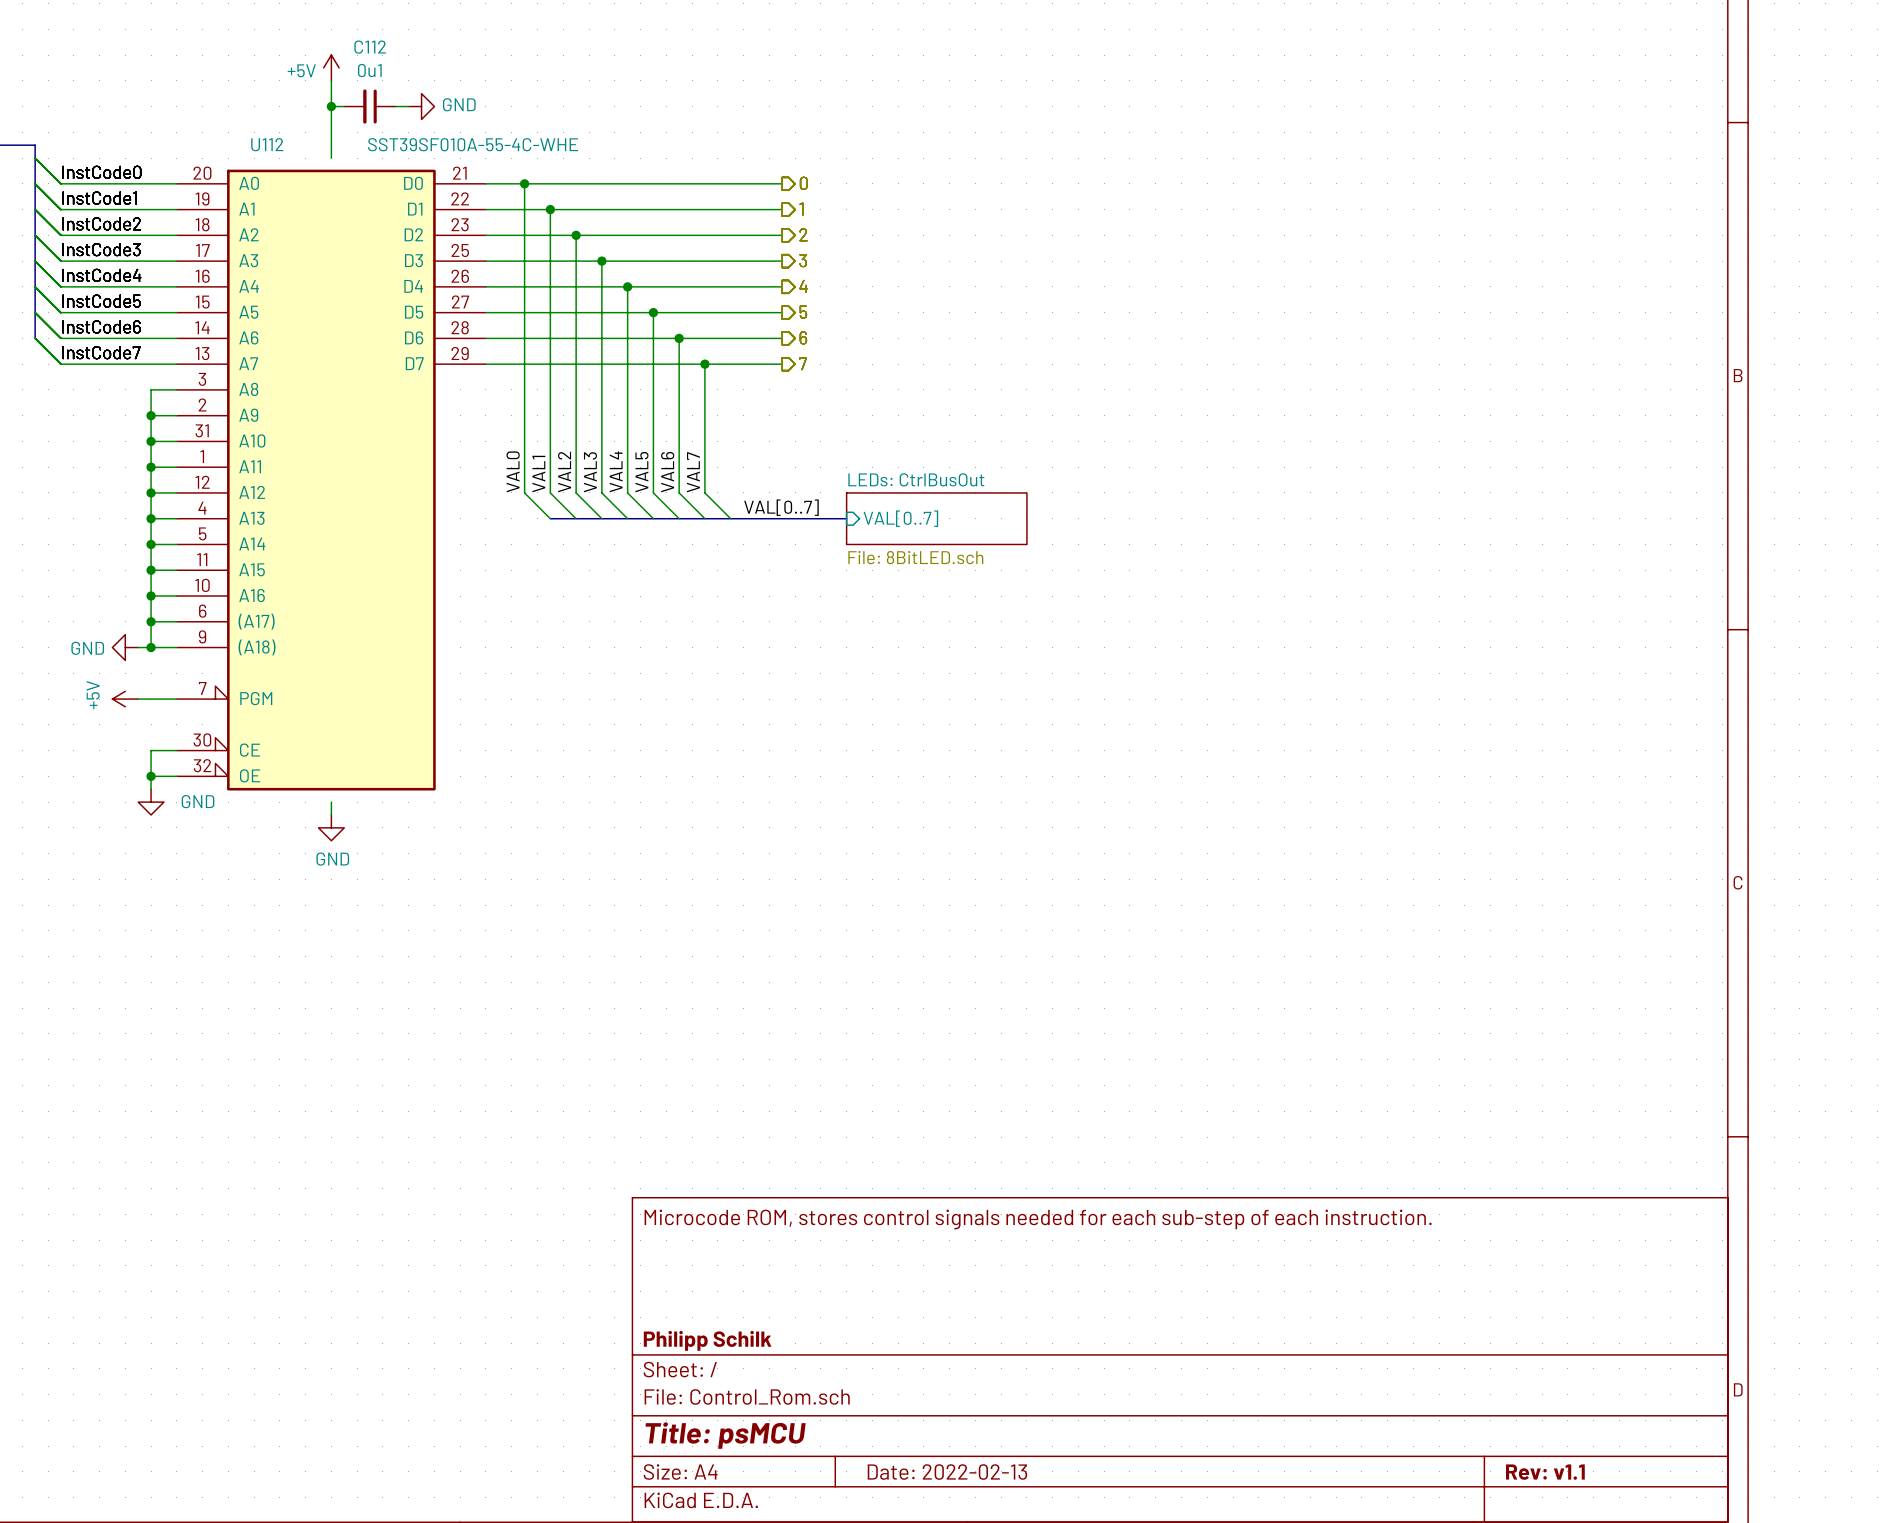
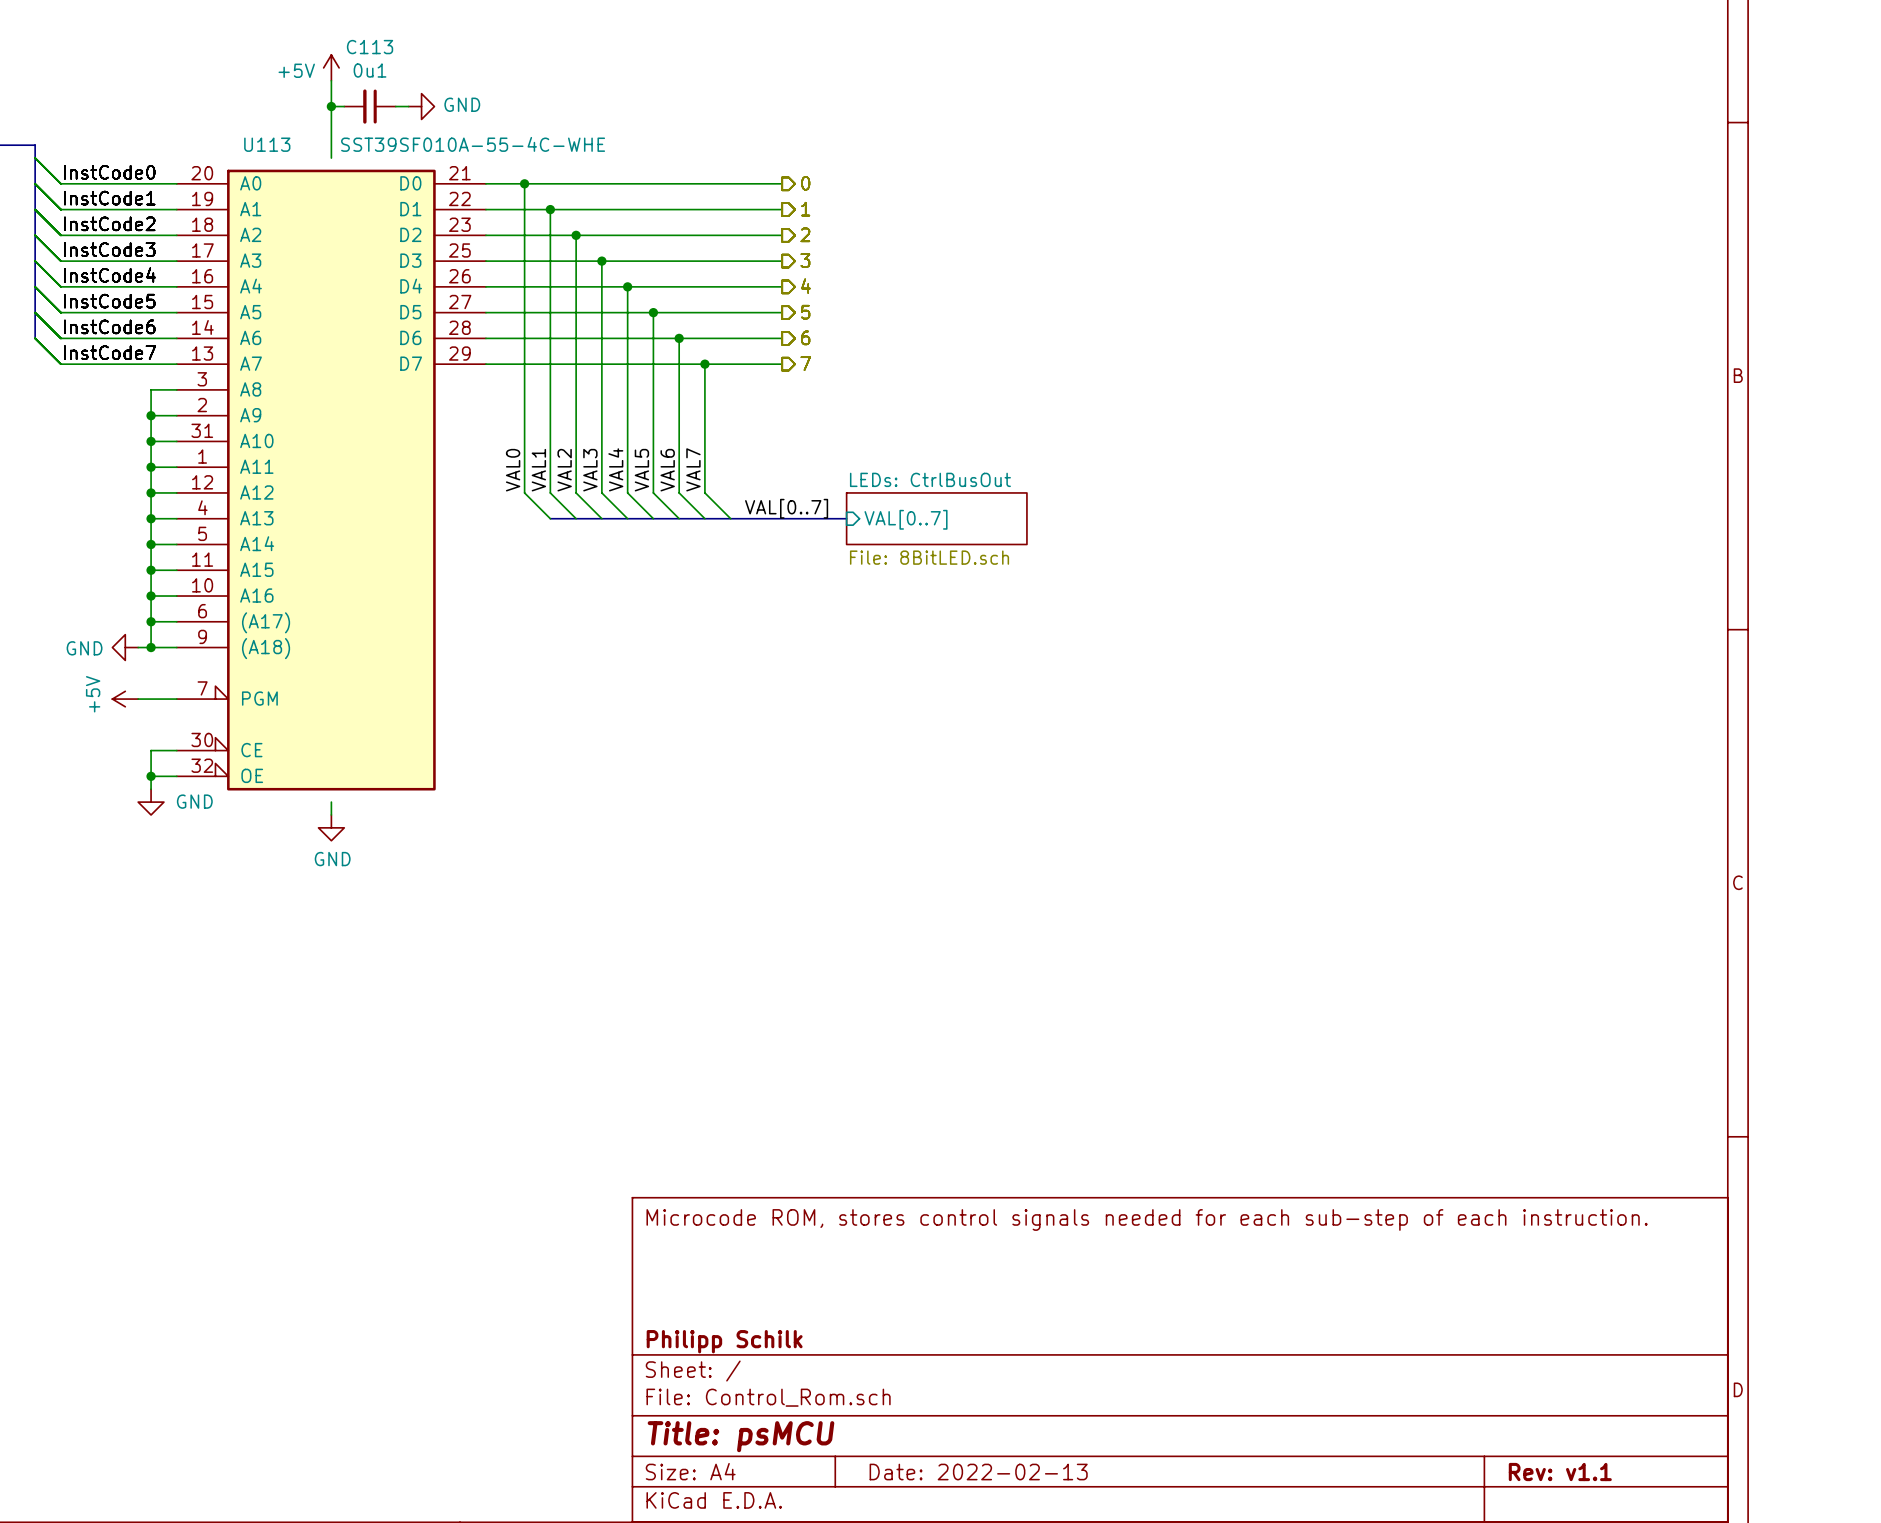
C112 name: C112 (370, 47) -> C113 (370, 47)
U112 name: U112 (267, 144) -> U113 (267, 144)

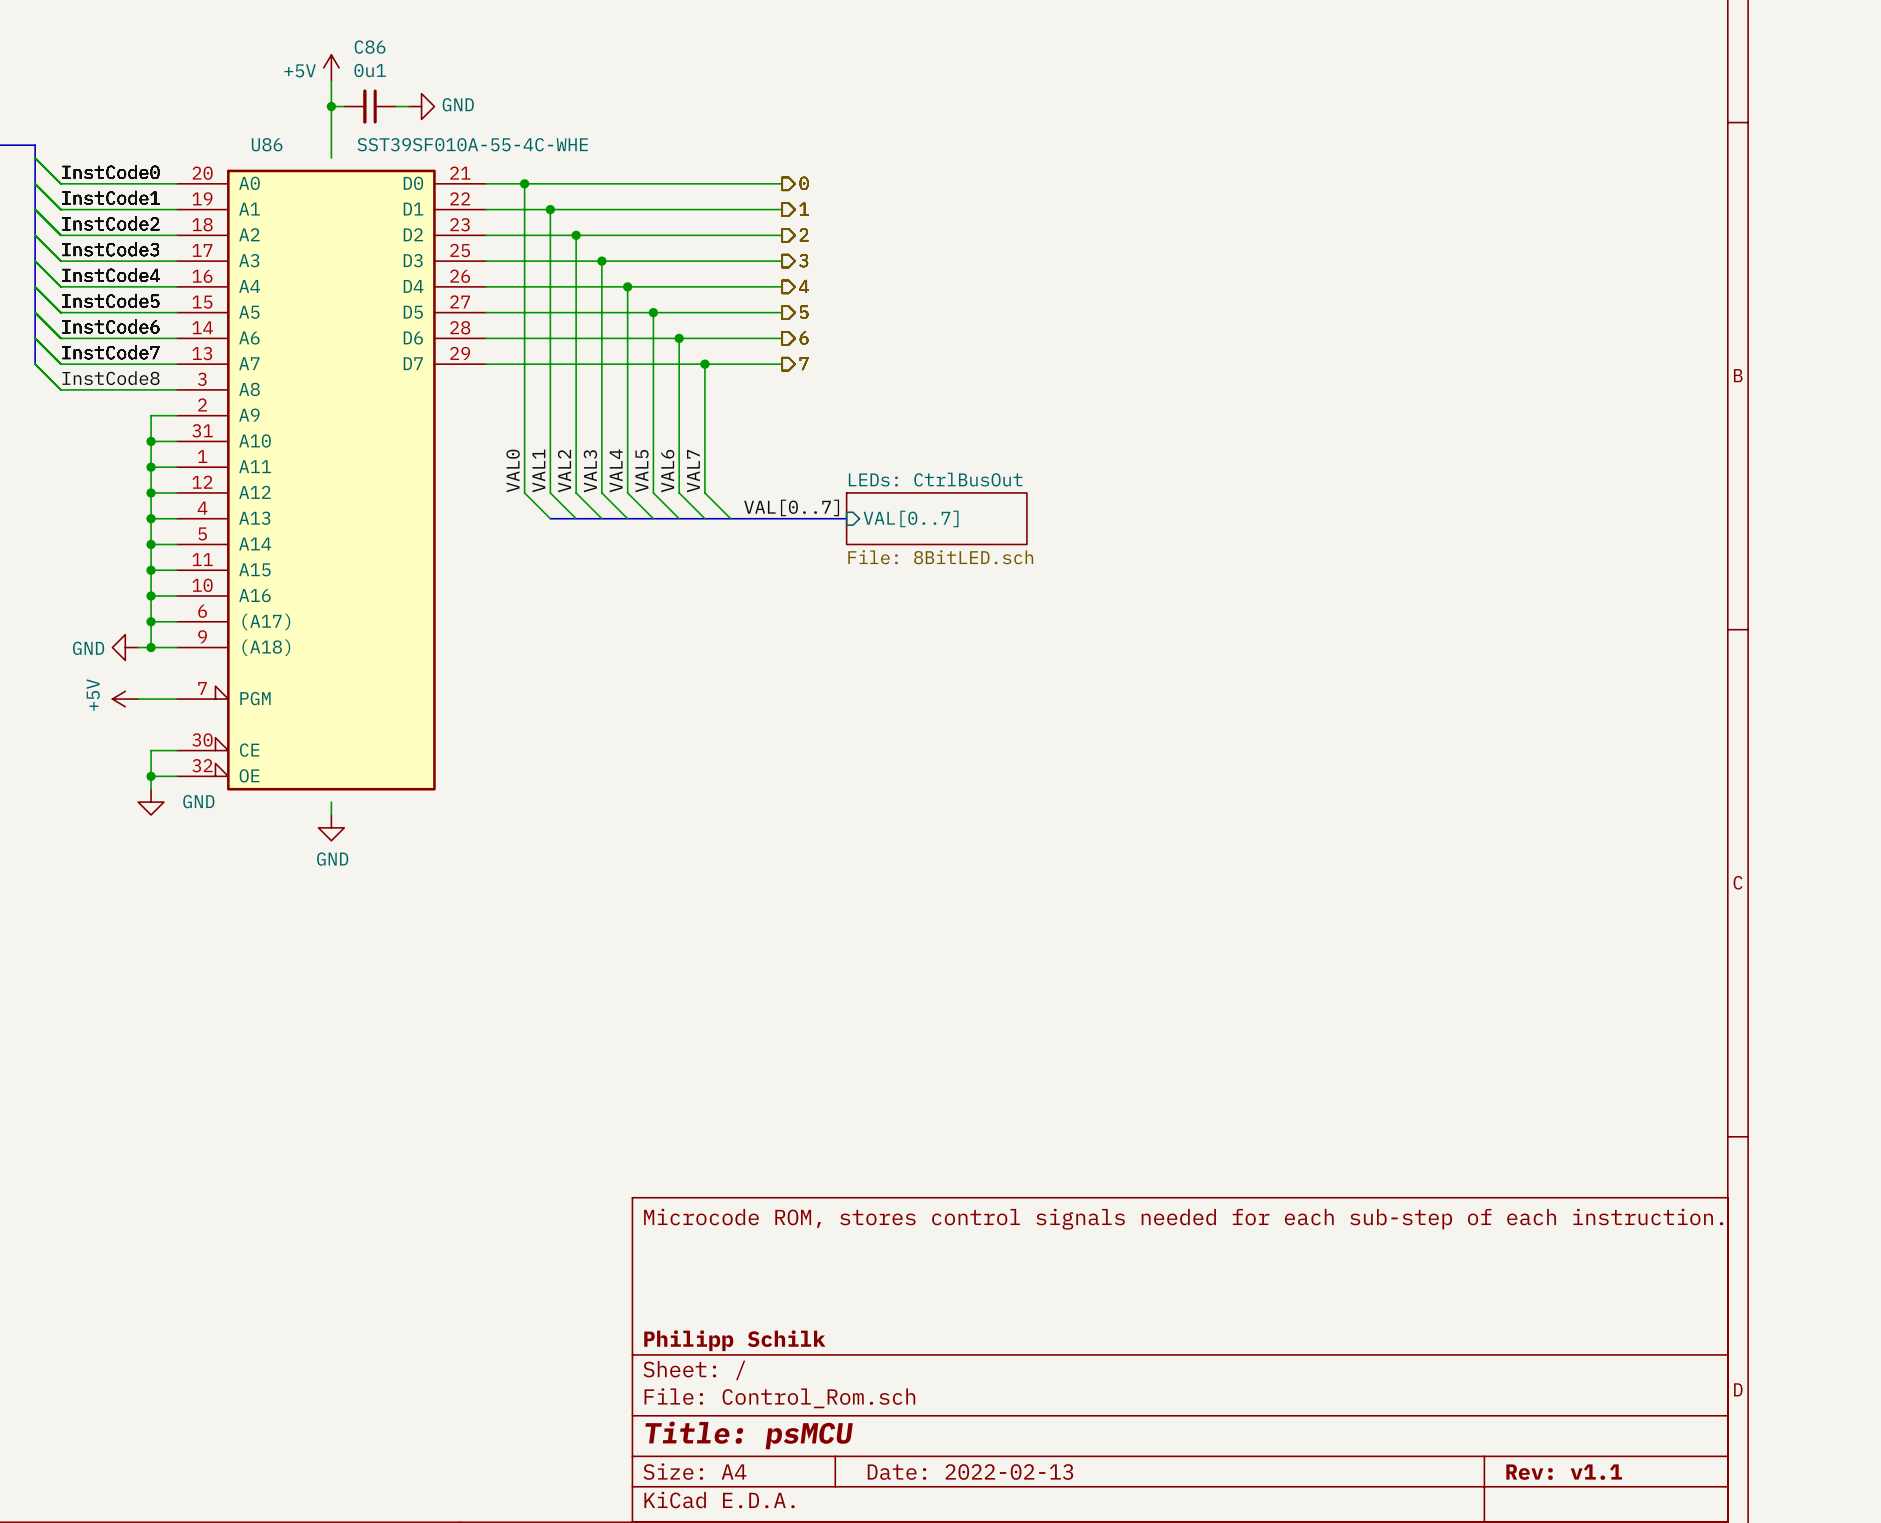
C113 name: C113 (370, 47) -> C86 (370, 47)
U113 name: U113 (267, 144) -> U86 (267, 144)
bus: none -> (35, 338) (35, 364)
label: none -> InstCode8 (110, 378)
wire: (151, 389) (151, 415) -> (151, 389) (60, 389) (35, 364)
junction: (151, 415) -> none

